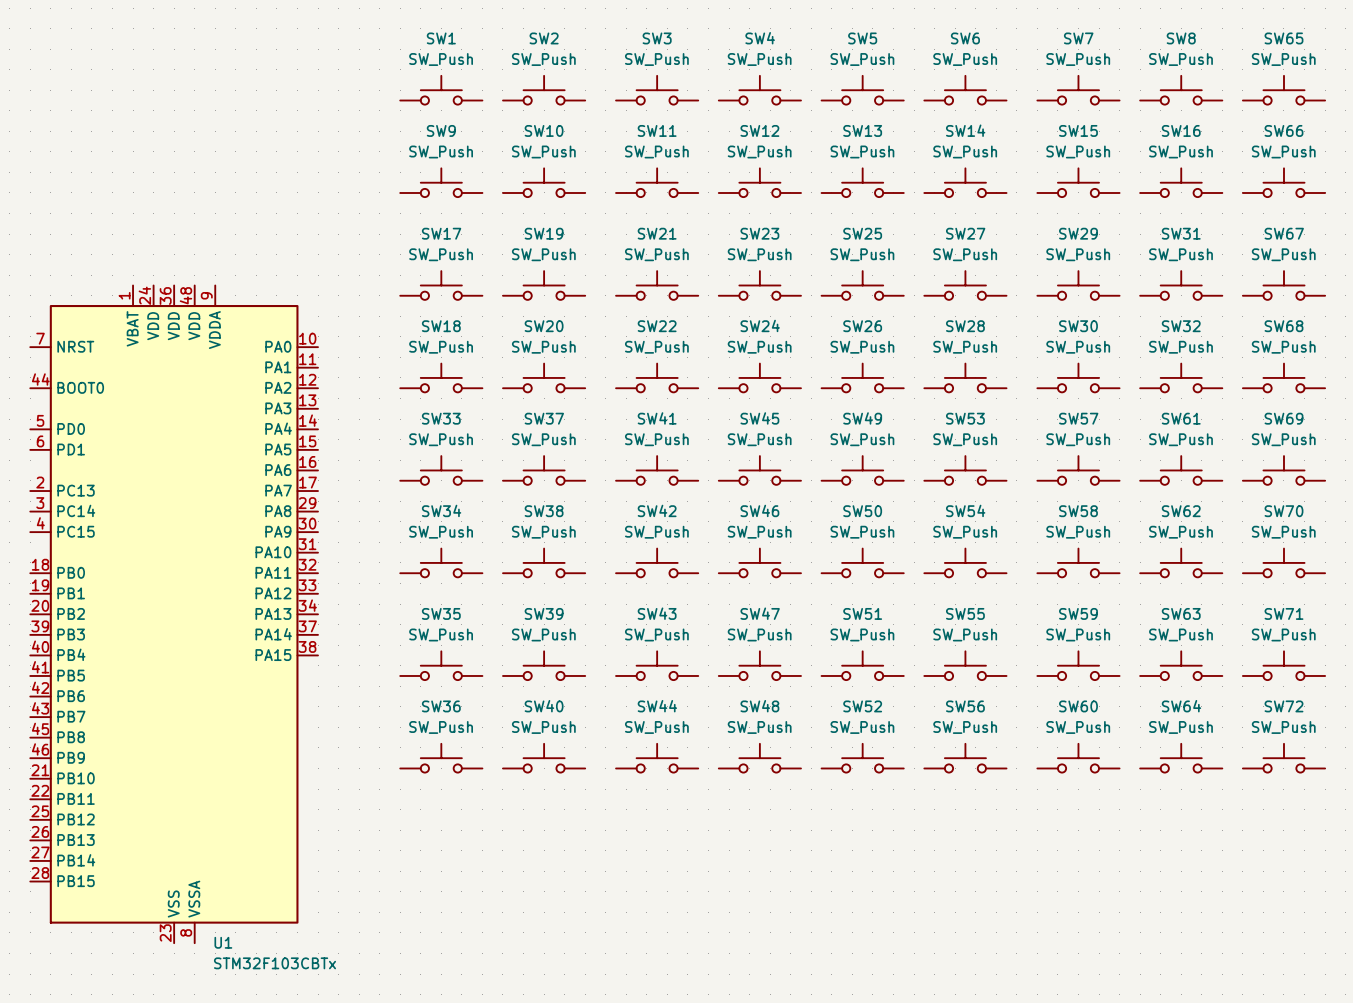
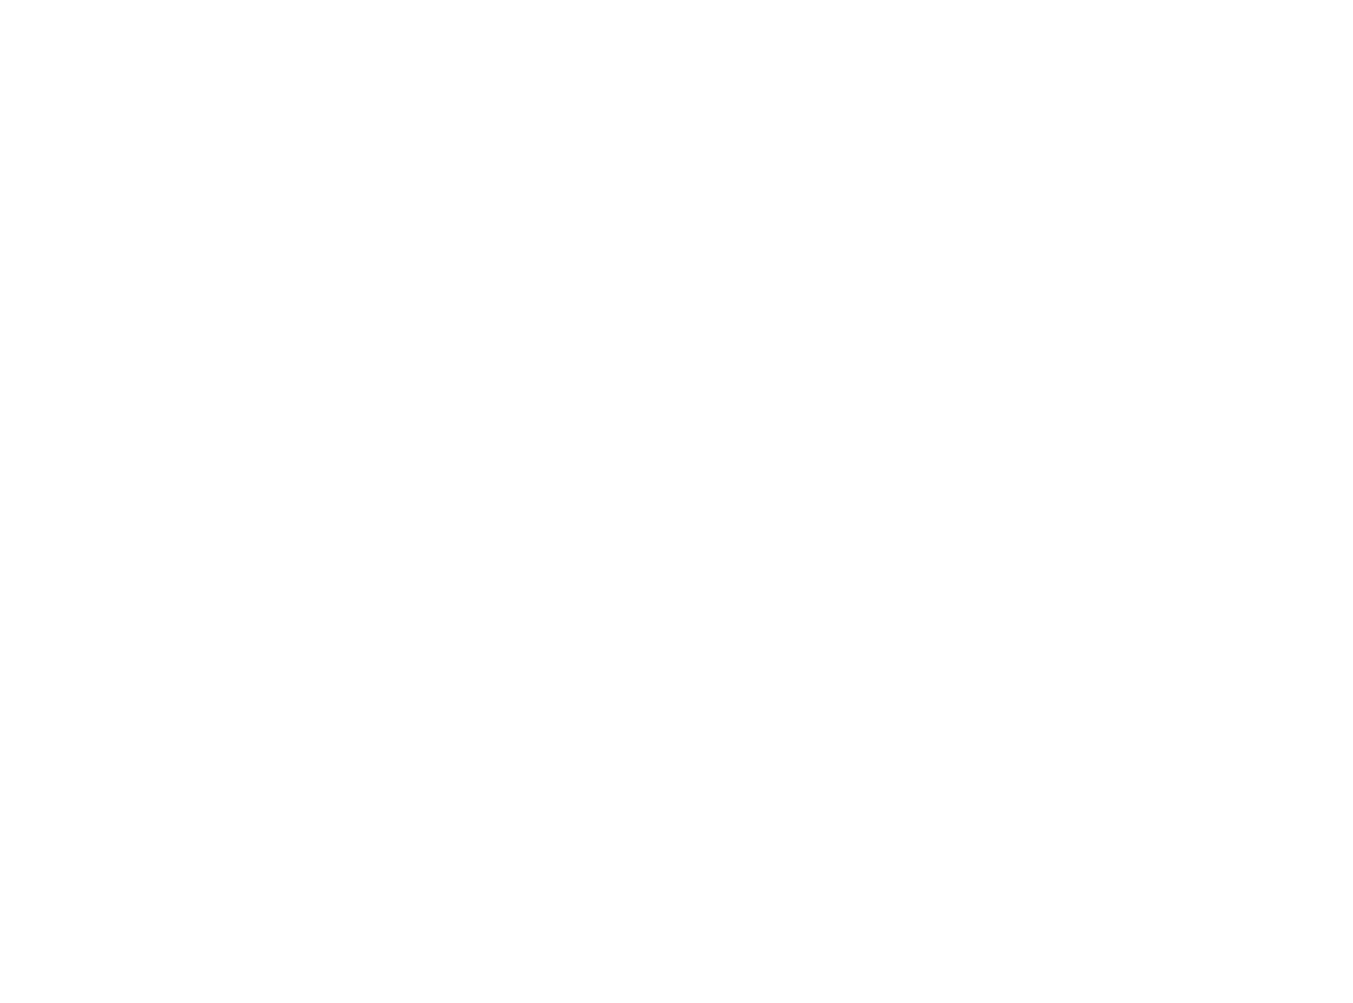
SW1: SW_Push (441, 90) -> none
SW2: SW_Push (544, 90) -> none
SW3: SW_Push (657, 90) -> none
SW4: SW_Push (759, 90) -> none
SW5: SW_Push (862, 90) -> none
SW6: SW_Push (965, 90) -> none
SW7: SW_Push (1078, 90) -> none
SW8: SW_Push (1181, 90) -> none
SW65: SW_Push (1283, 90) -> none
SW9: SW_Push (441, 182) -> none
SW10: SW_Push (544, 182) -> none
SW11: SW_Push (657, 182) -> none
SW12: SW_Push (759, 182) -> none
SW13: SW_Push (862, 182) -> none
SW14: SW_Push (965, 182) -> none
SW15: SW_Push (1078, 182) -> none
SW16: SW_Push (1181, 182) -> none
SW66: SW_Push (1283, 182) -> none
SW17: SW_Push (441, 285) -> none
SW19: SW_Push (544, 285) -> none
SW21: SW_Push (657, 285) -> none
SW23: SW_Push (759, 285) -> none
SW25: SW_Push (862, 285) -> none
SW27: SW_Push (965, 285) -> none
SW29: SW_Push (1078, 285) -> none
SW31: SW_Push (1181, 285) -> none
SW67: SW_Push (1283, 285) -> none
SW18: SW_Push (441, 377) -> none
SW20: SW_Push (544, 377) -> none
SW22: SW_Push (657, 377) -> none
SW24: SW_Push (759, 377) -> none
SW26: SW_Push (862, 377) -> none
SW28: SW_Push (965, 377) -> none
SW30: SW_Push (1078, 377) -> none
SW32: SW_Push (1181, 377) -> none
SW68: SW_Push (1283, 377) -> none
SW33: SW_Push (441, 470) -> none
SW37: SW_Push (544, 470) -> none
SW41: SW_Push (657, 470) -> none
SW45: SW_Push (759, 470) -> none
SW49: SW_Push (862, 470) -> none
SW53: SW_Push (965, 470) -> none
SW57: SW_Push (1078, 470) -> none
SW61: SW_Push (1181, 470) -> none
SW69: SW_Push (1283, 470) -> none
SW34: SW_Push (441, 562) -> none
SW38: SW_Push (544, 562) -> none
SW42: SW_Push (657, 562) -> none
SW46: SW_Push (759, 562) -> none
SW50: SW_Push (862, 562) -> none
SW54: SW_Push (965, 562) -> none
SW58: SW_Push (1078, 562) -> none
SW62: SW_Push (1181, 562) -> none
SW70: SW_Push (1283, 562) -> none
U1: STM32F103CBTx (174, 614) -> none
SW35: SW_Push (441, 665) -> none
SW39: SW_Push (544, 665) -> none
SW43: SW_Push (657, 665) -> none
SW47: SW_Push (759, 665) -> none
SW51: SW_Push (862, 665) -> none
SW55: SW_Push (965, 665) -> none
SW59: SW_Push (1078, 665) -> none
SW63: SW_Push (1181, 665) -> none
SW71: SW_Push (1283, 665) -> none
SW36: SW_Push (441, 758) -> none
SW40: SW_Push (544, 758) -> none
SW44: SW_Push (657, 758) -> none
SW48: SW_Push (759, 758) -> none
SW52: SW_Push (862, 758) -> none
SW56: SW_Push (965, 758) -> none
SW60: SW_Push (1078, 758) -> none
SW64: SW_Push (1181, 758) -> none
SW72: SW_Push (1283, 758) -> none

